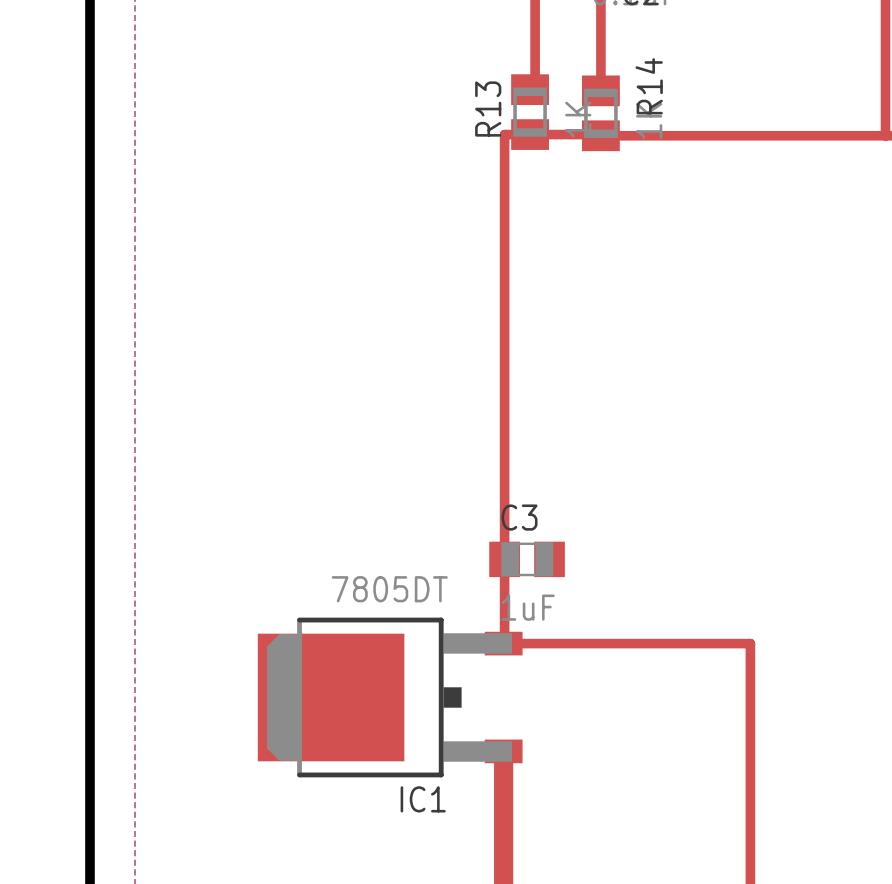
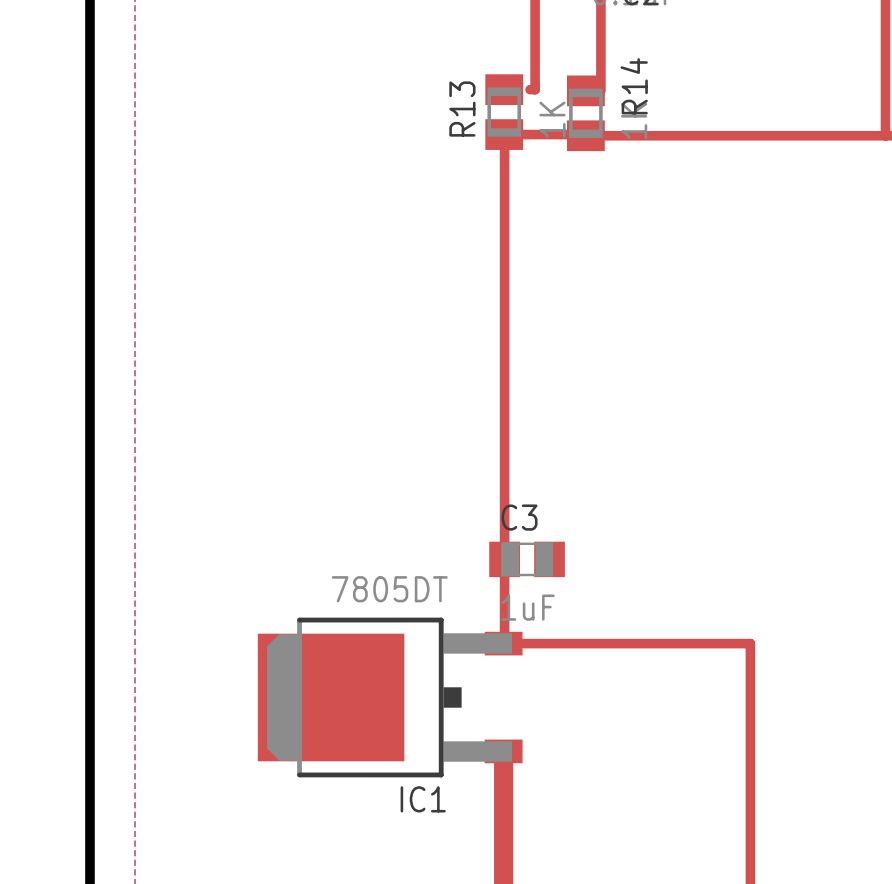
R13 position: (530, 112) -> (504, 112)
R14 position: (600, 113) -> (585, 113)

